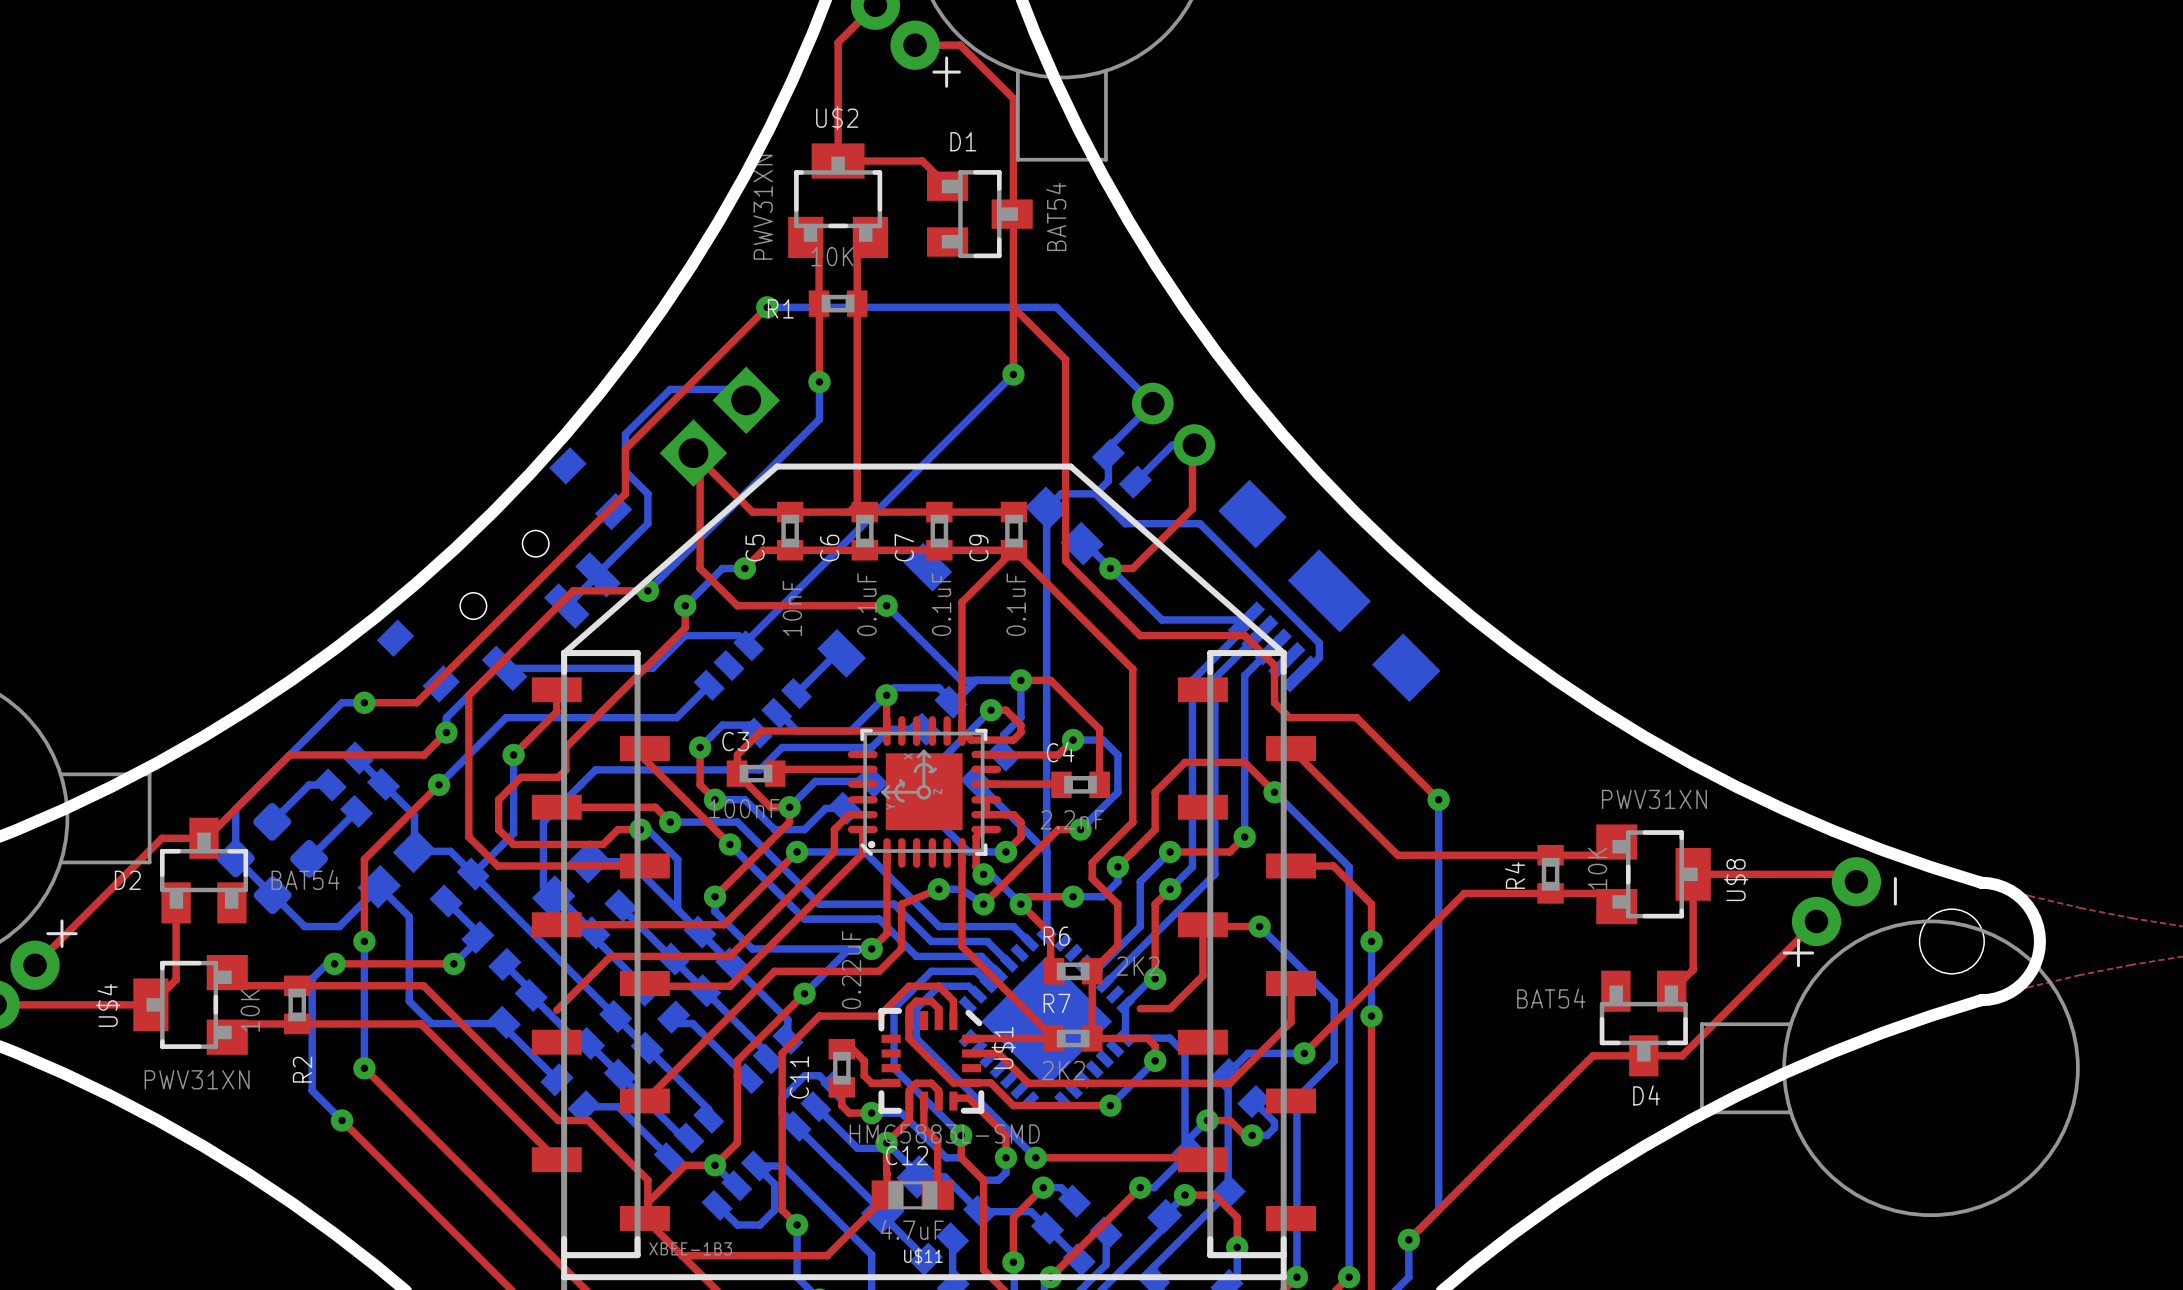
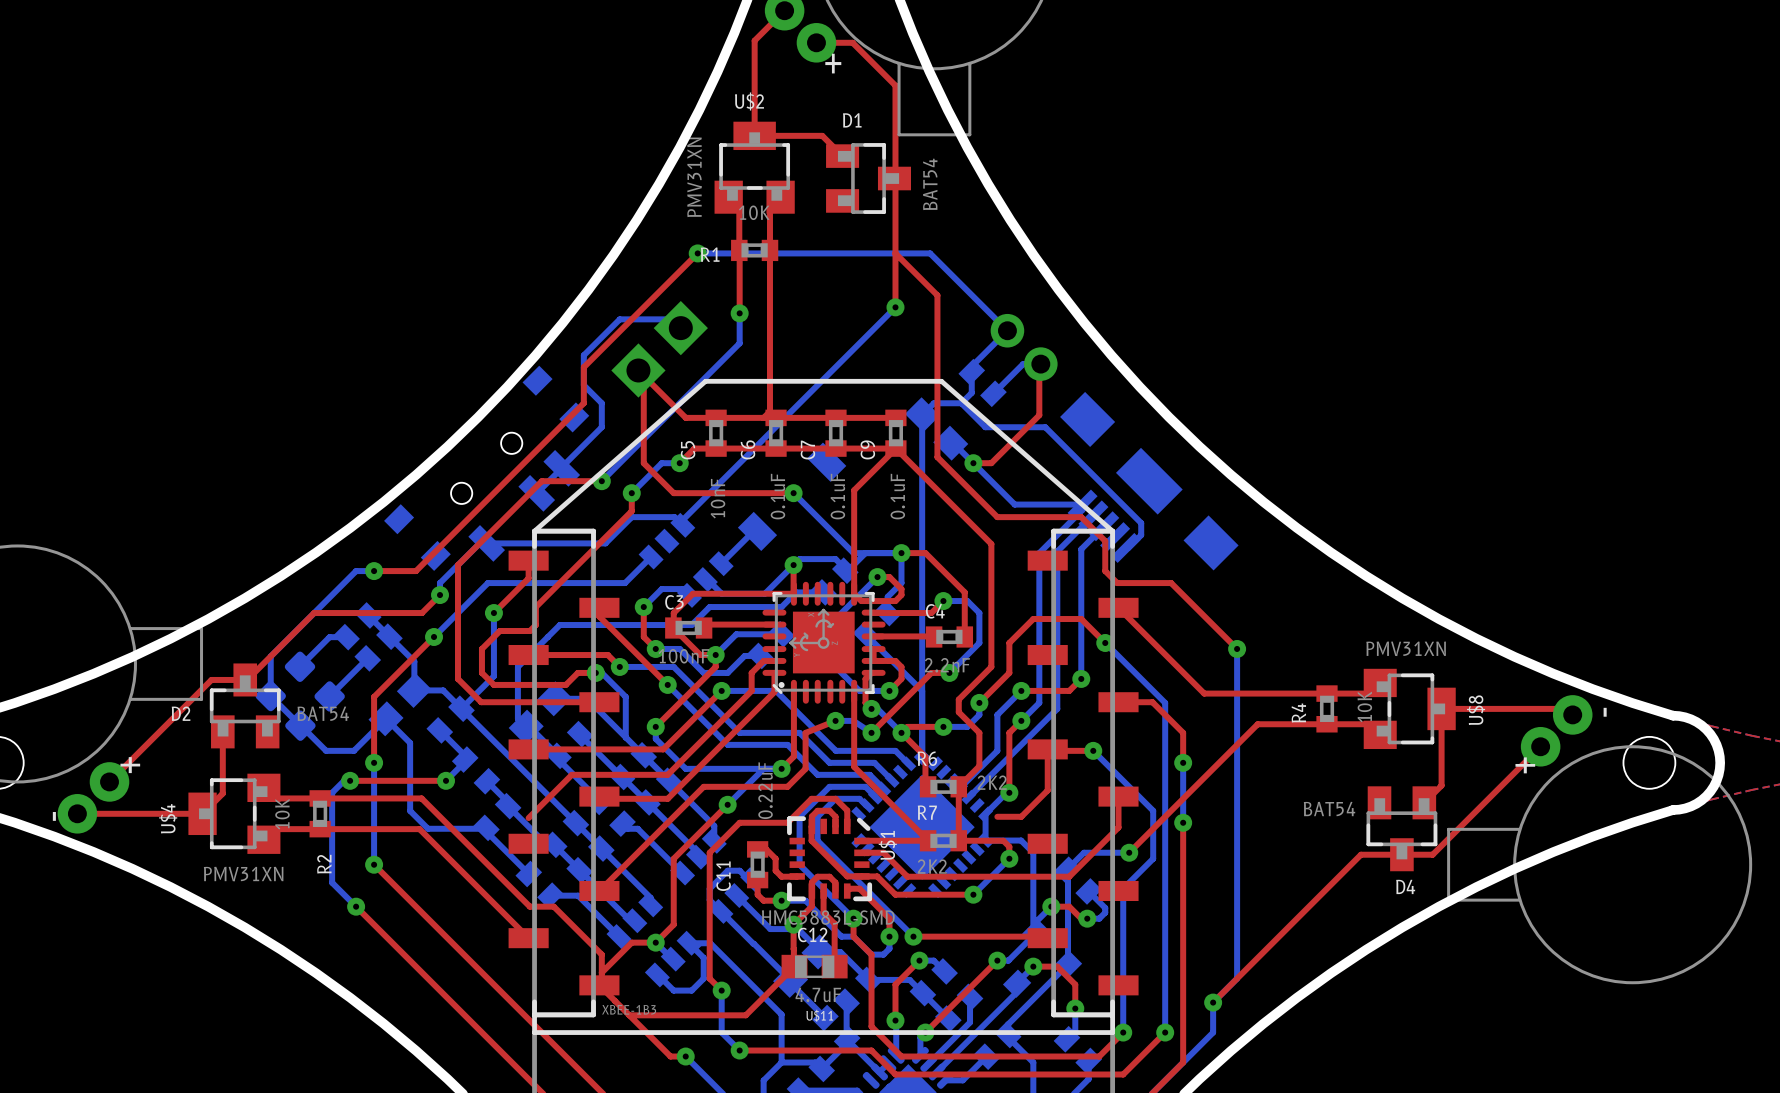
U$2 value: PWV31XN (763, 207) -> PMV31XN (694, 177)
U$8 value: PWV31XN (1654, 799) -> PMV31XN (1406, 648)
U$4 value: PWV31XN (197, 1079) -> PMV31XN (243, 874)

